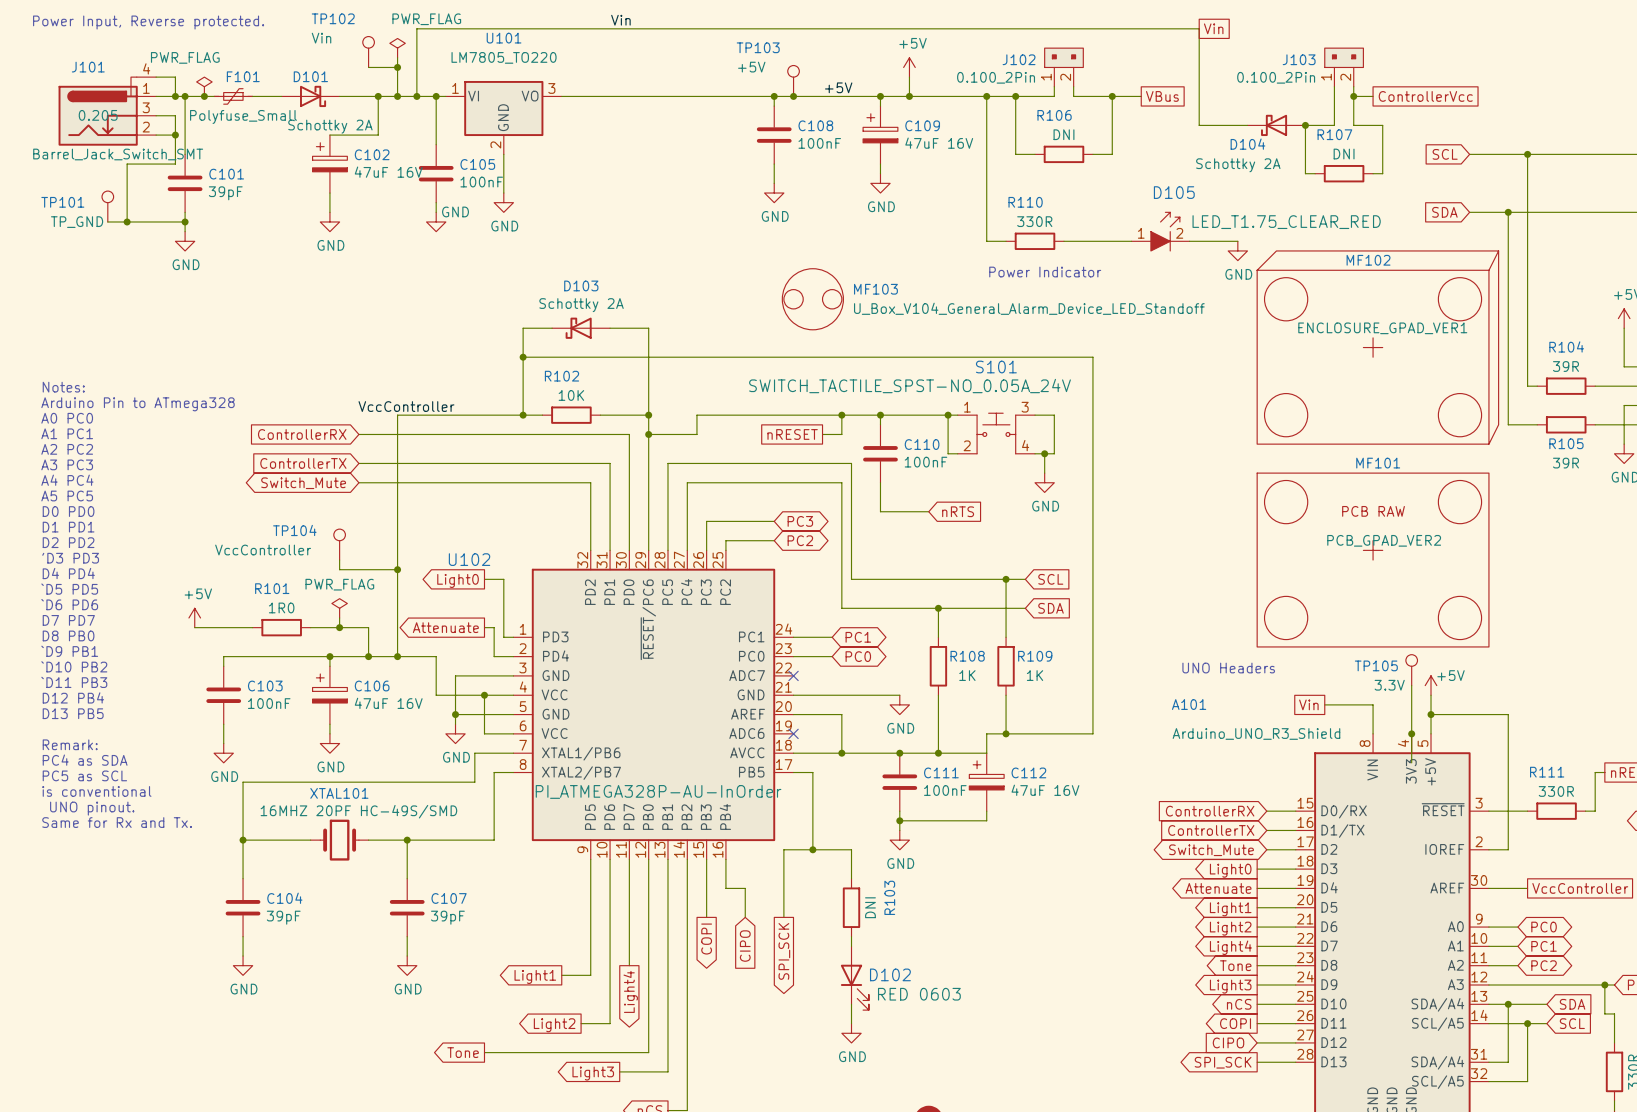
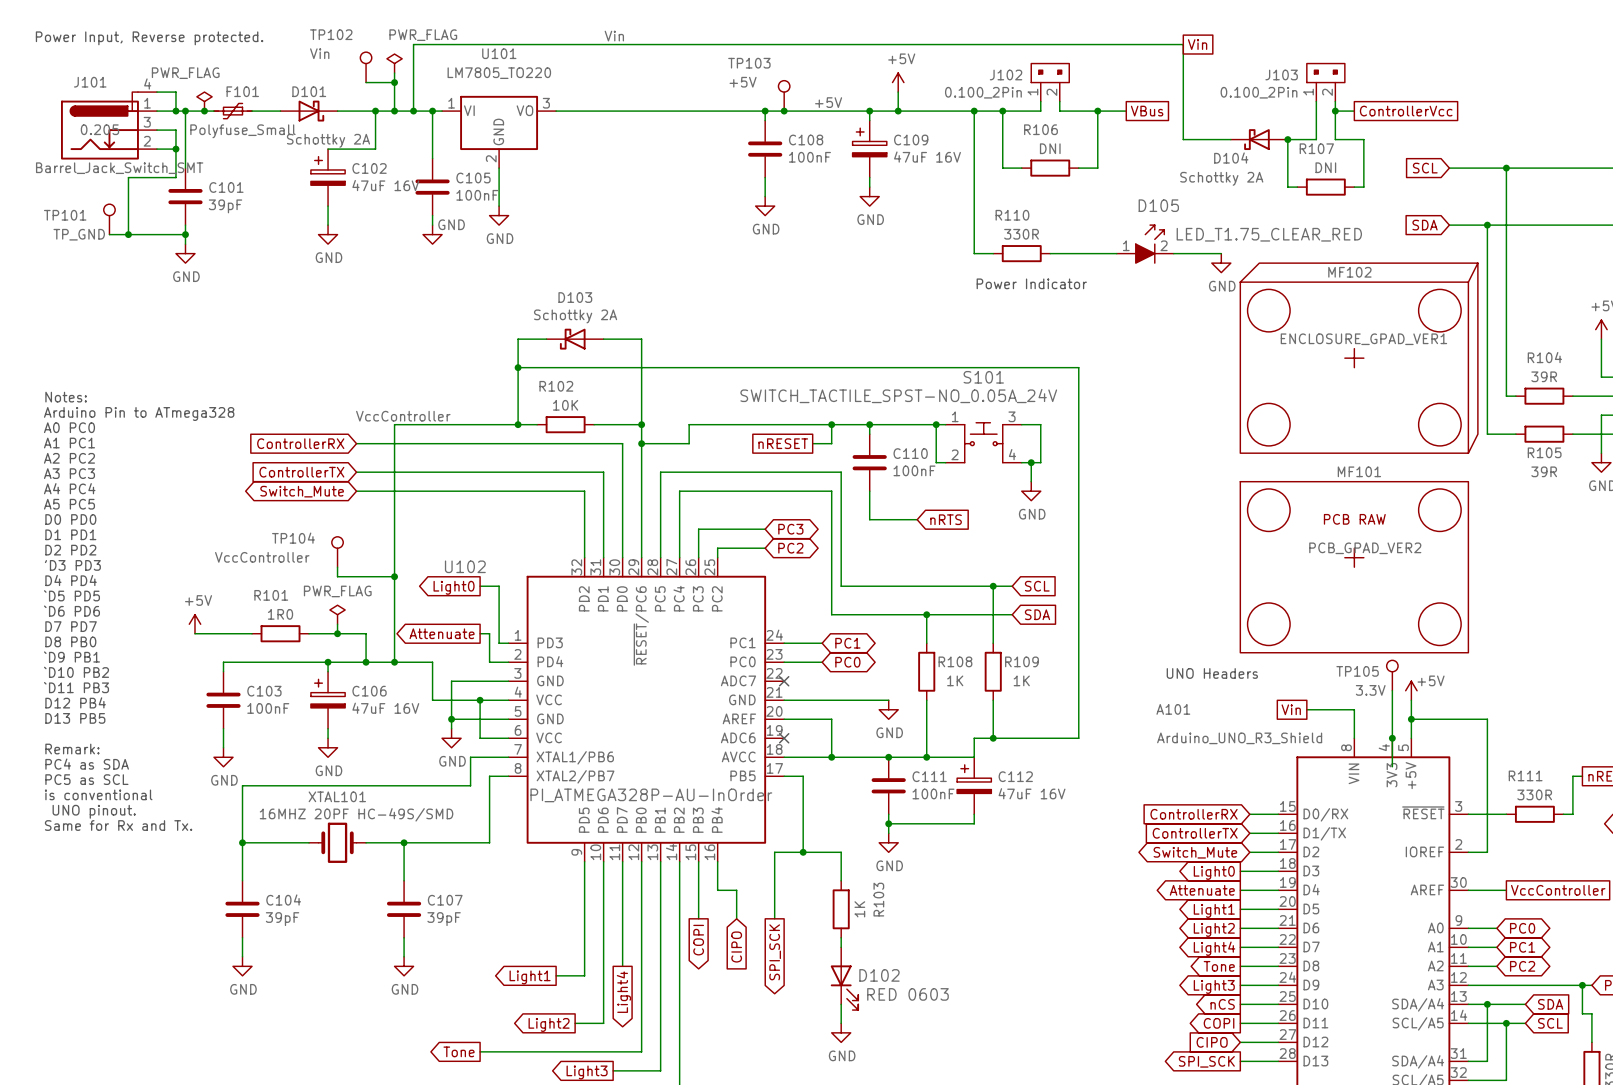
MF103: U_Box_V104_General_Alarm_Device_LED_Standoff (812, 299) -> none
R103 value: DNI (870, 907) -> 1K (859, 909)

